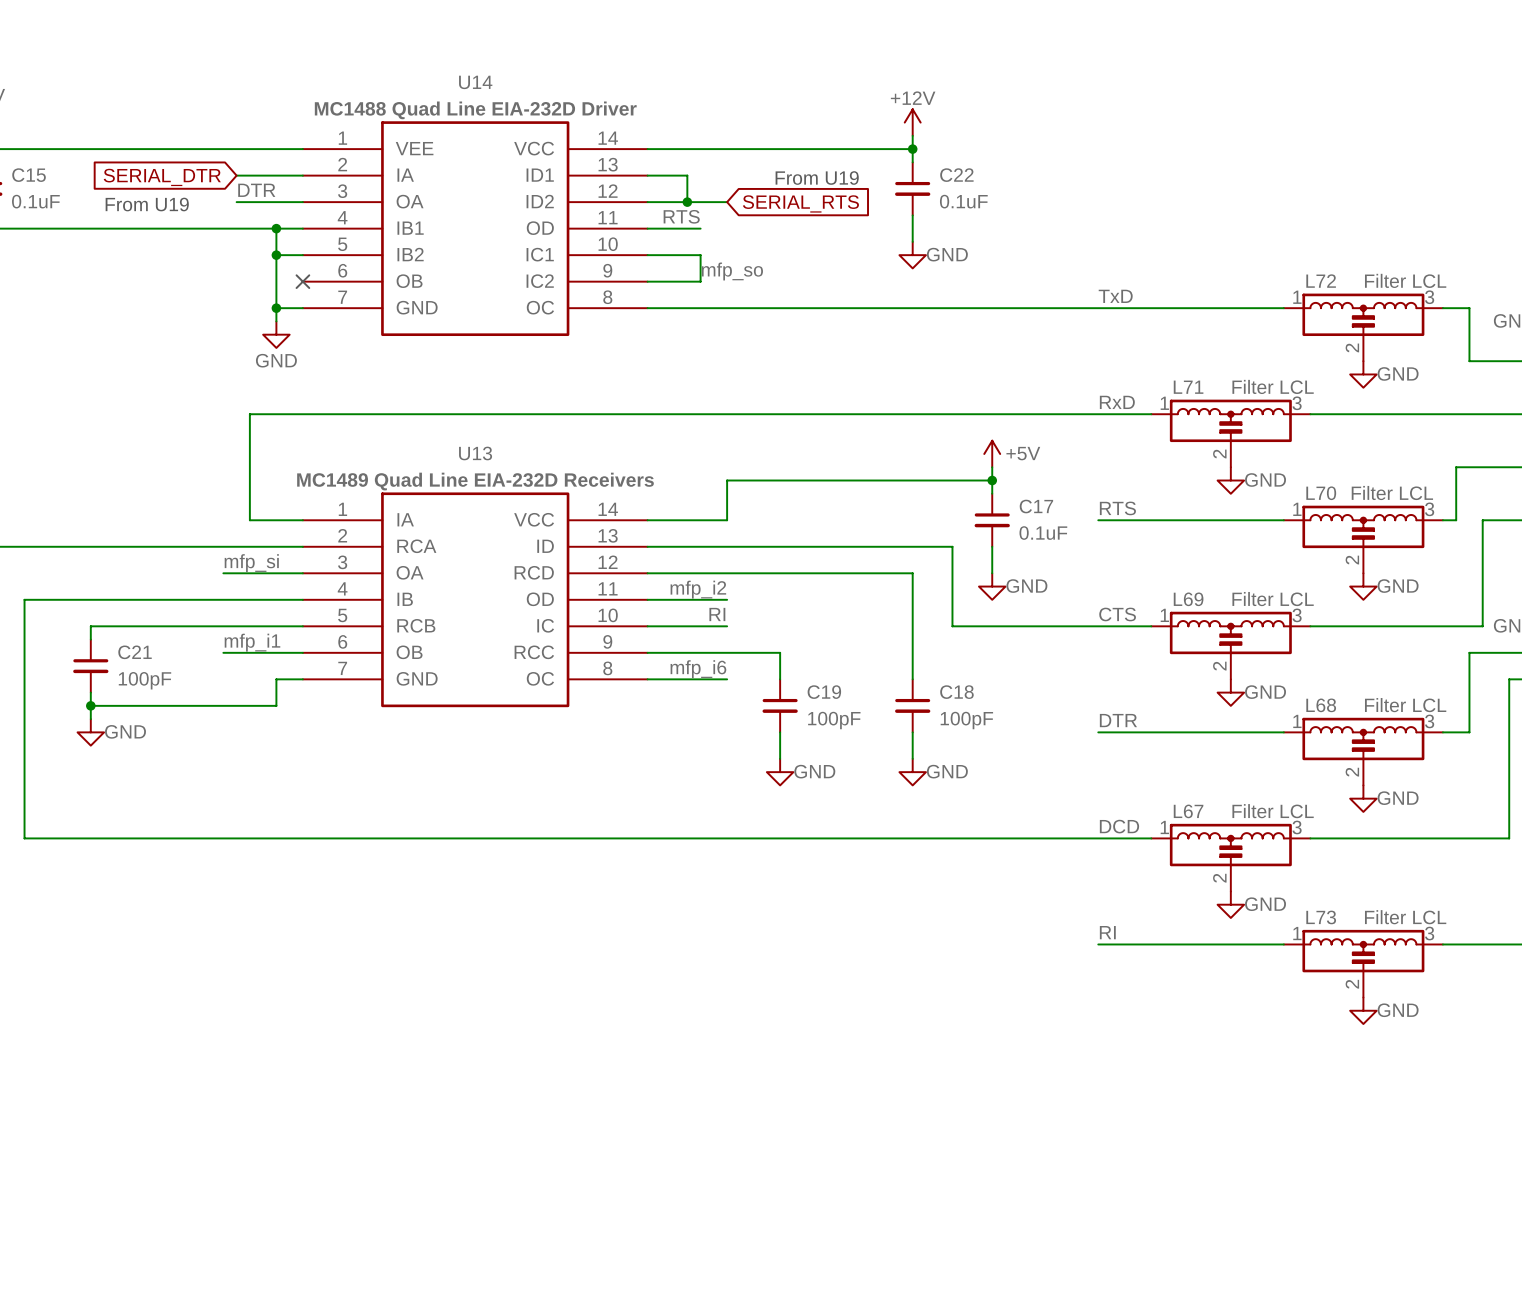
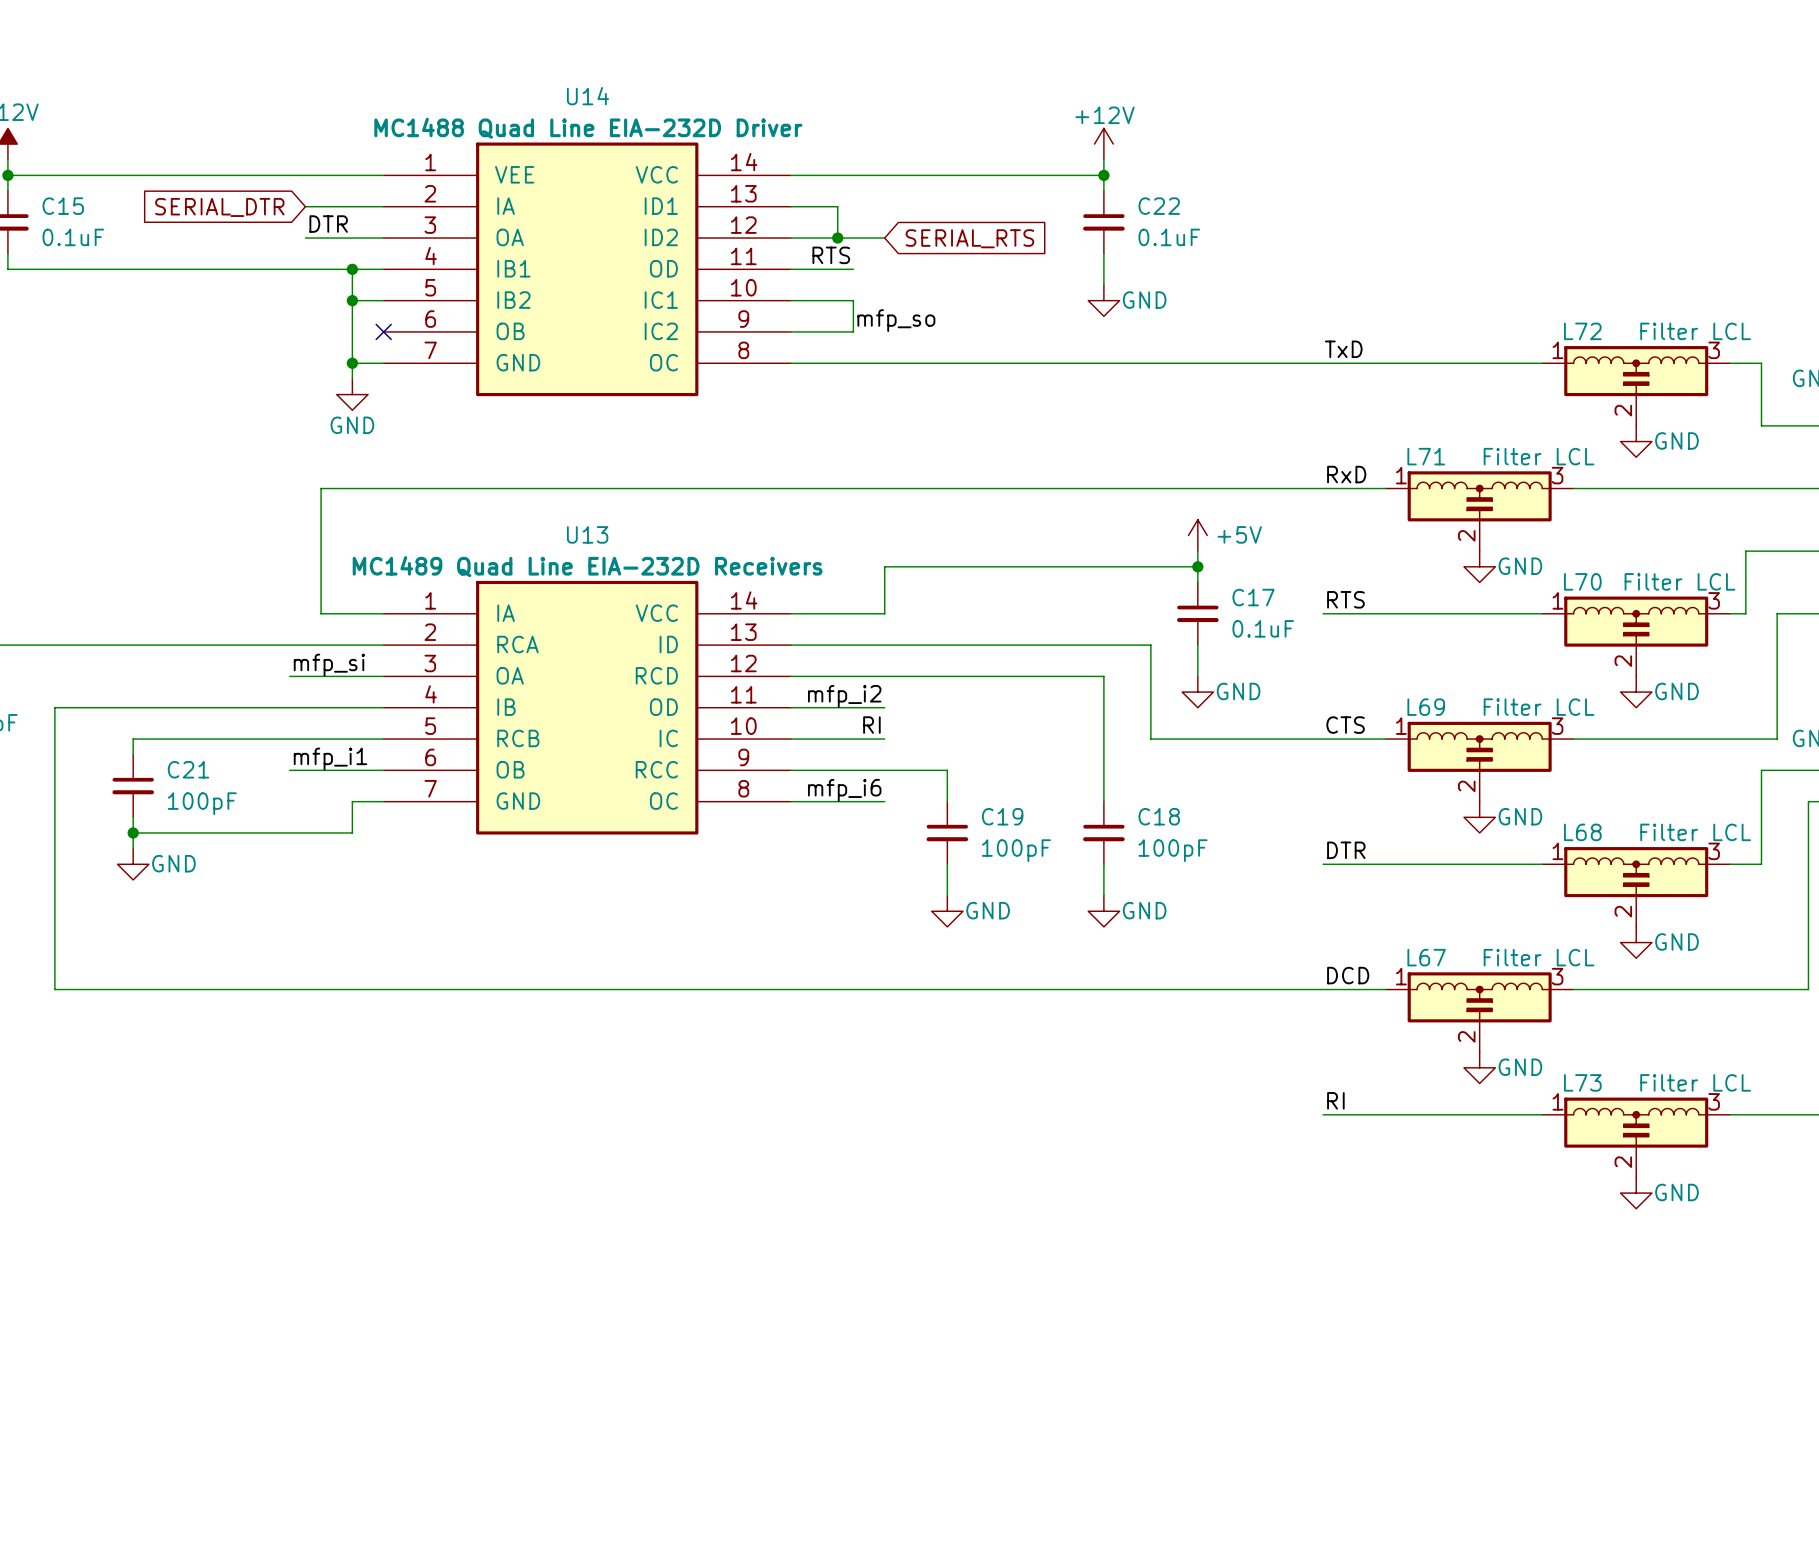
text: From U19 (817, 178) -> none
text: From U19 (147, 204) -> none

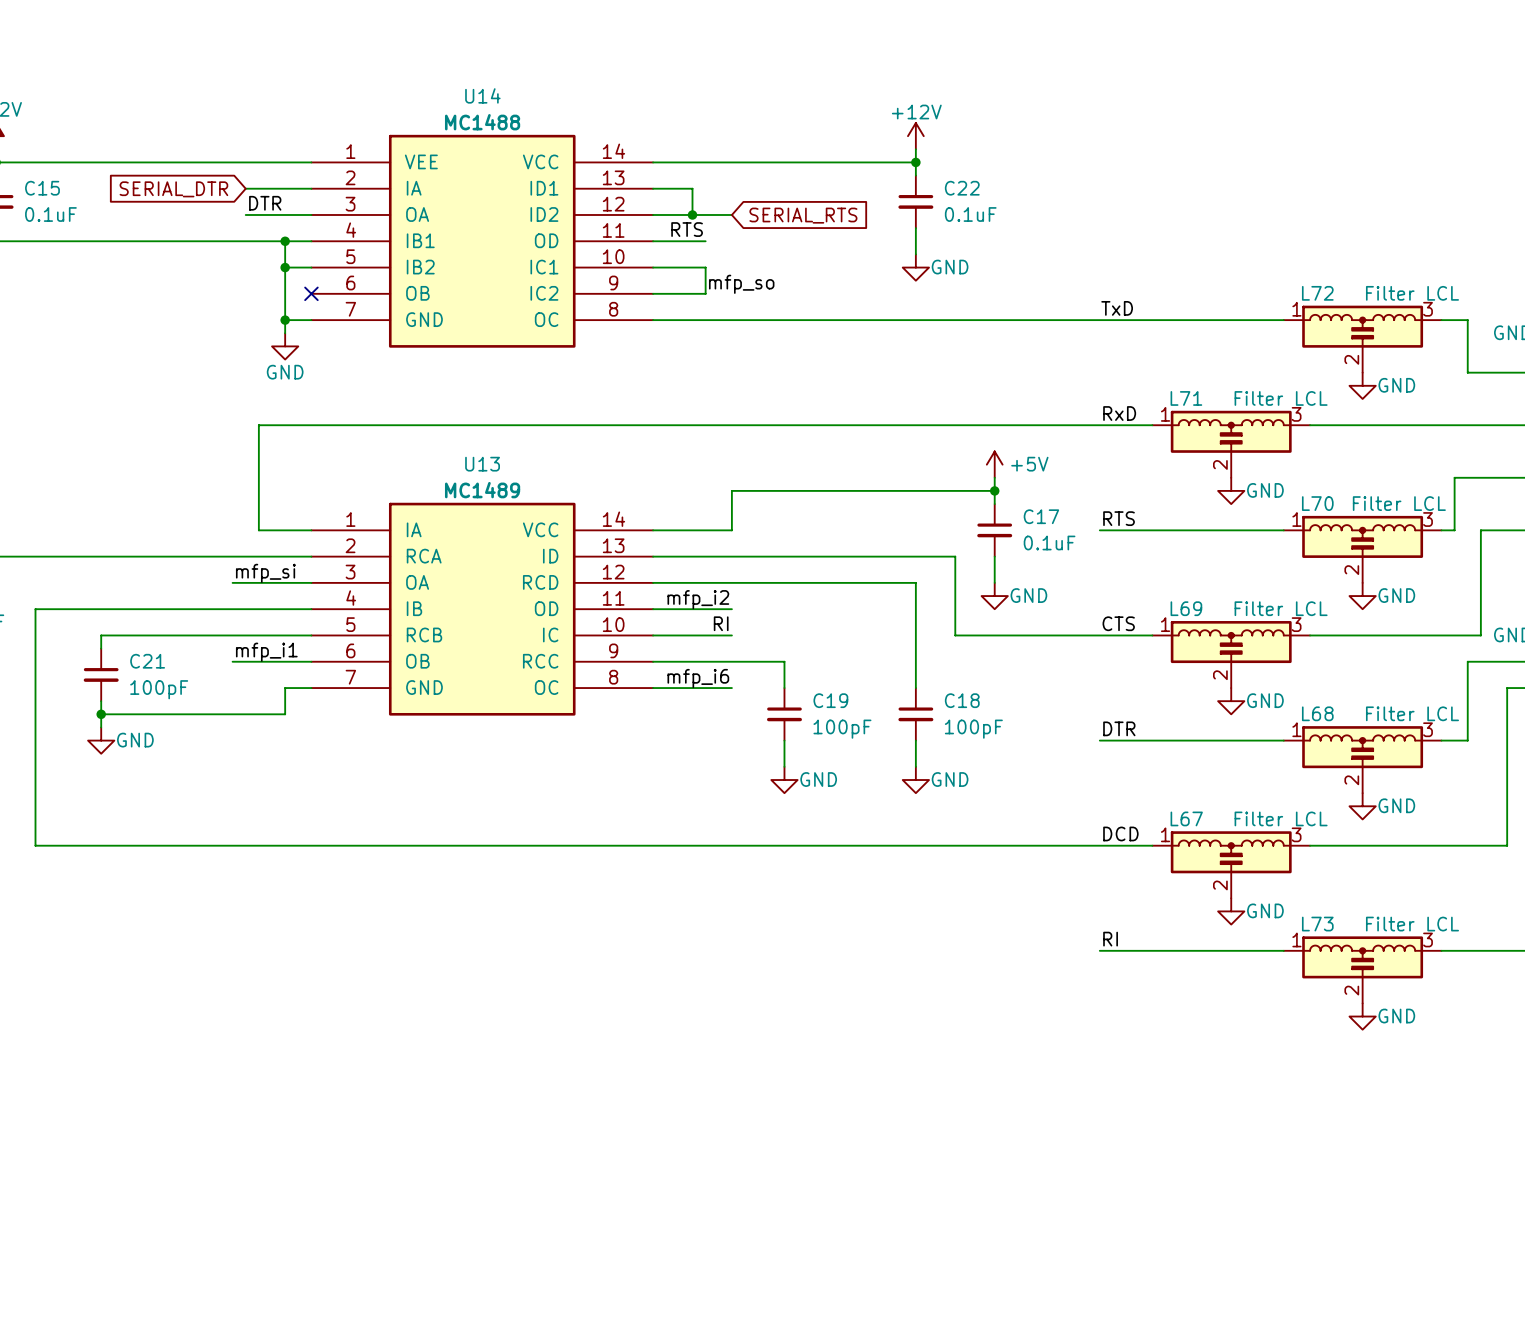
U14 value: MC1488 Quad Line EIA-232D Driver (588, 128) -> MC1488 (482, 122)
U13 value: MC1489 Quad Line EIA-232D Receivers (587, 566) -> MC1489 (482, 490)

